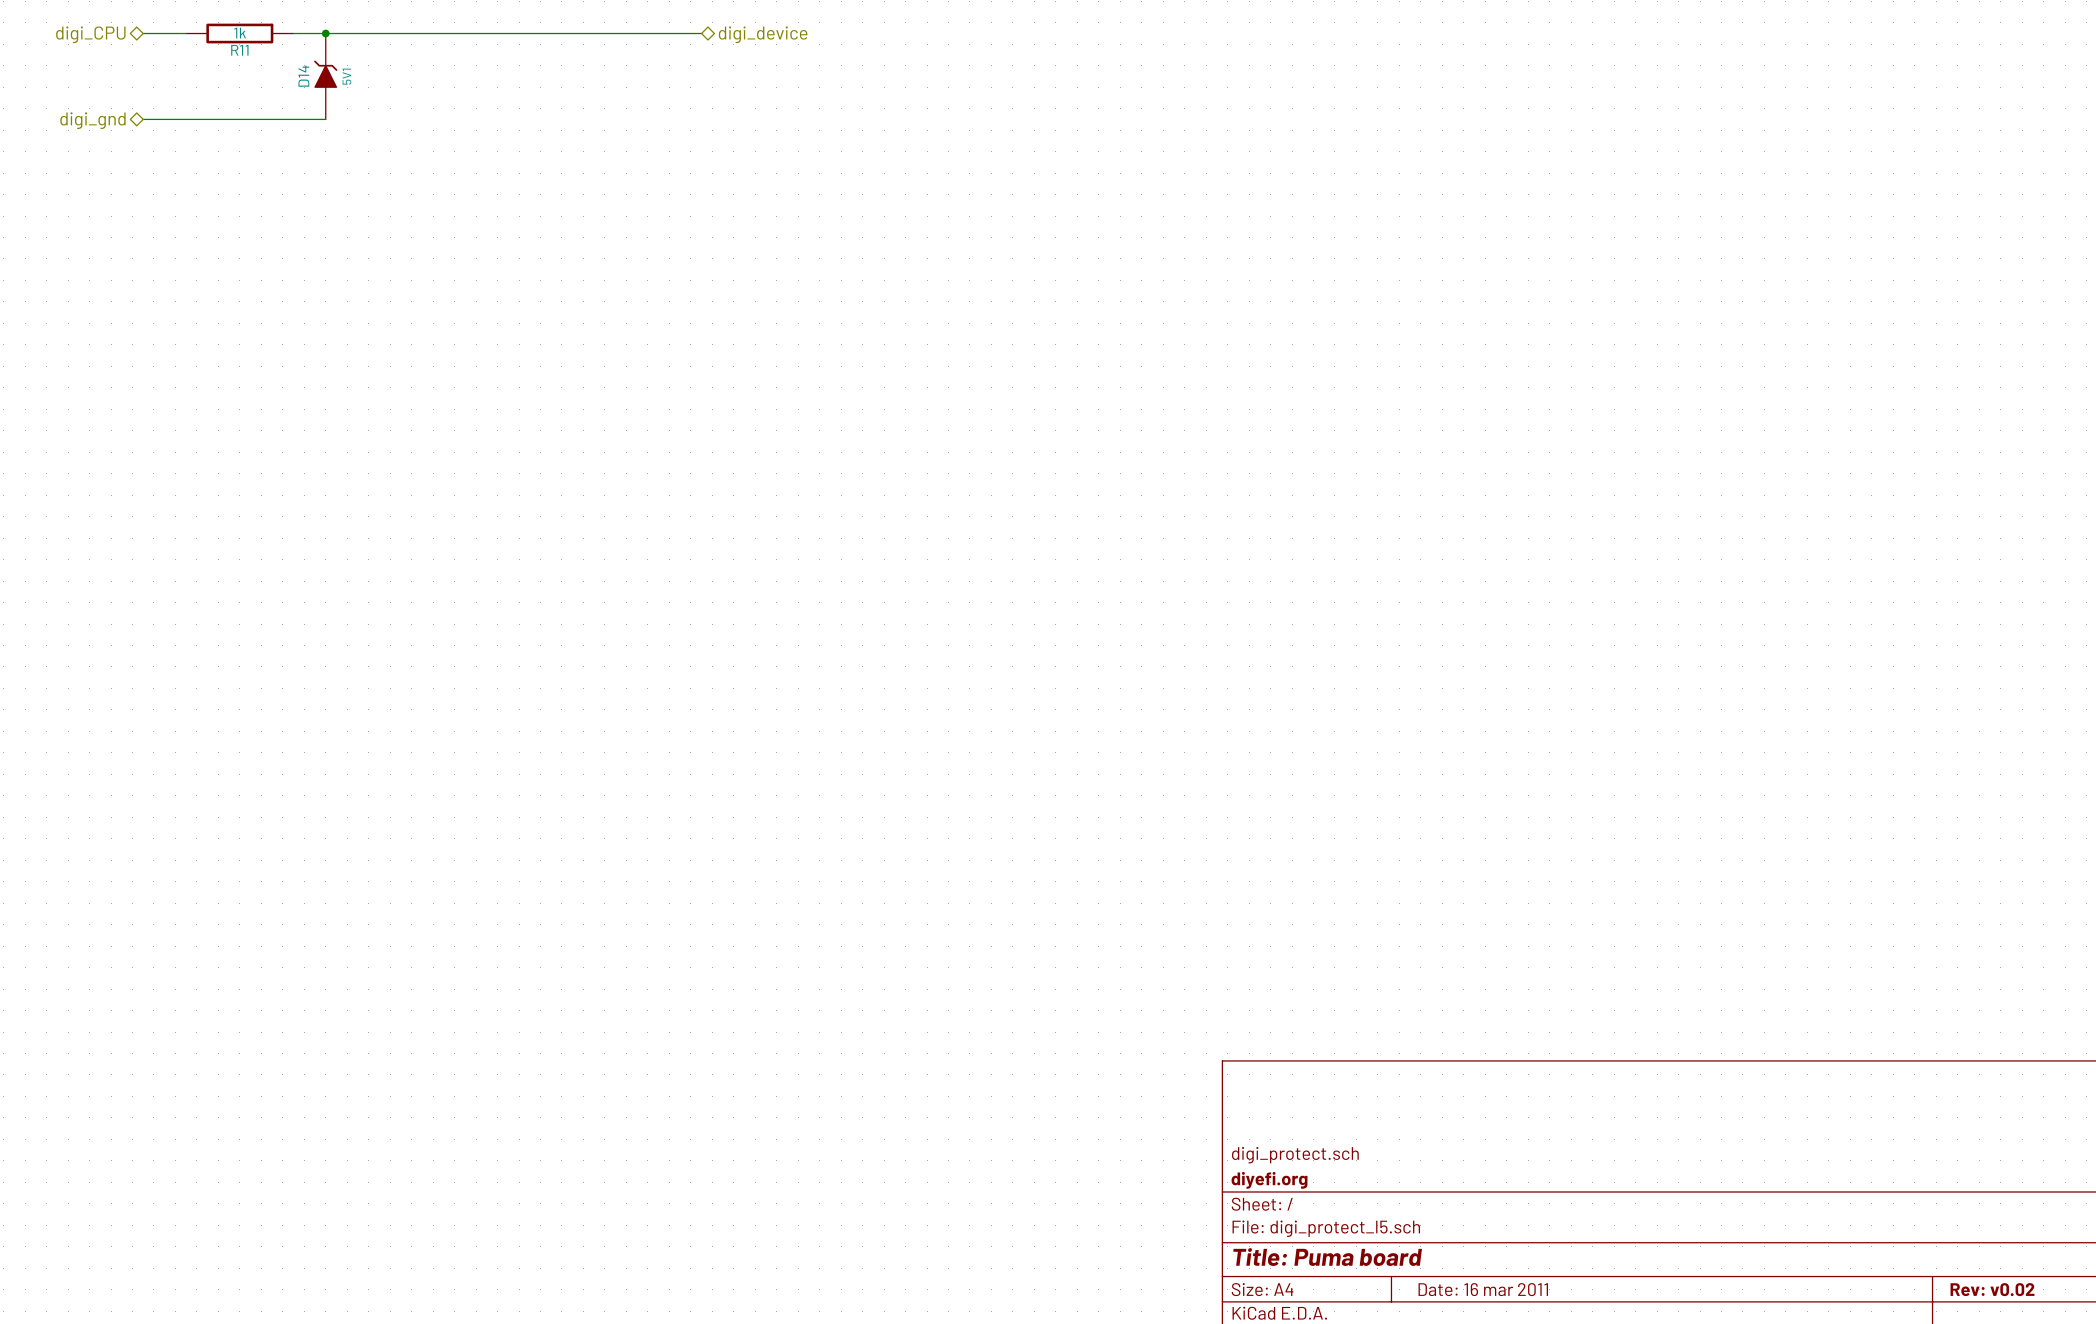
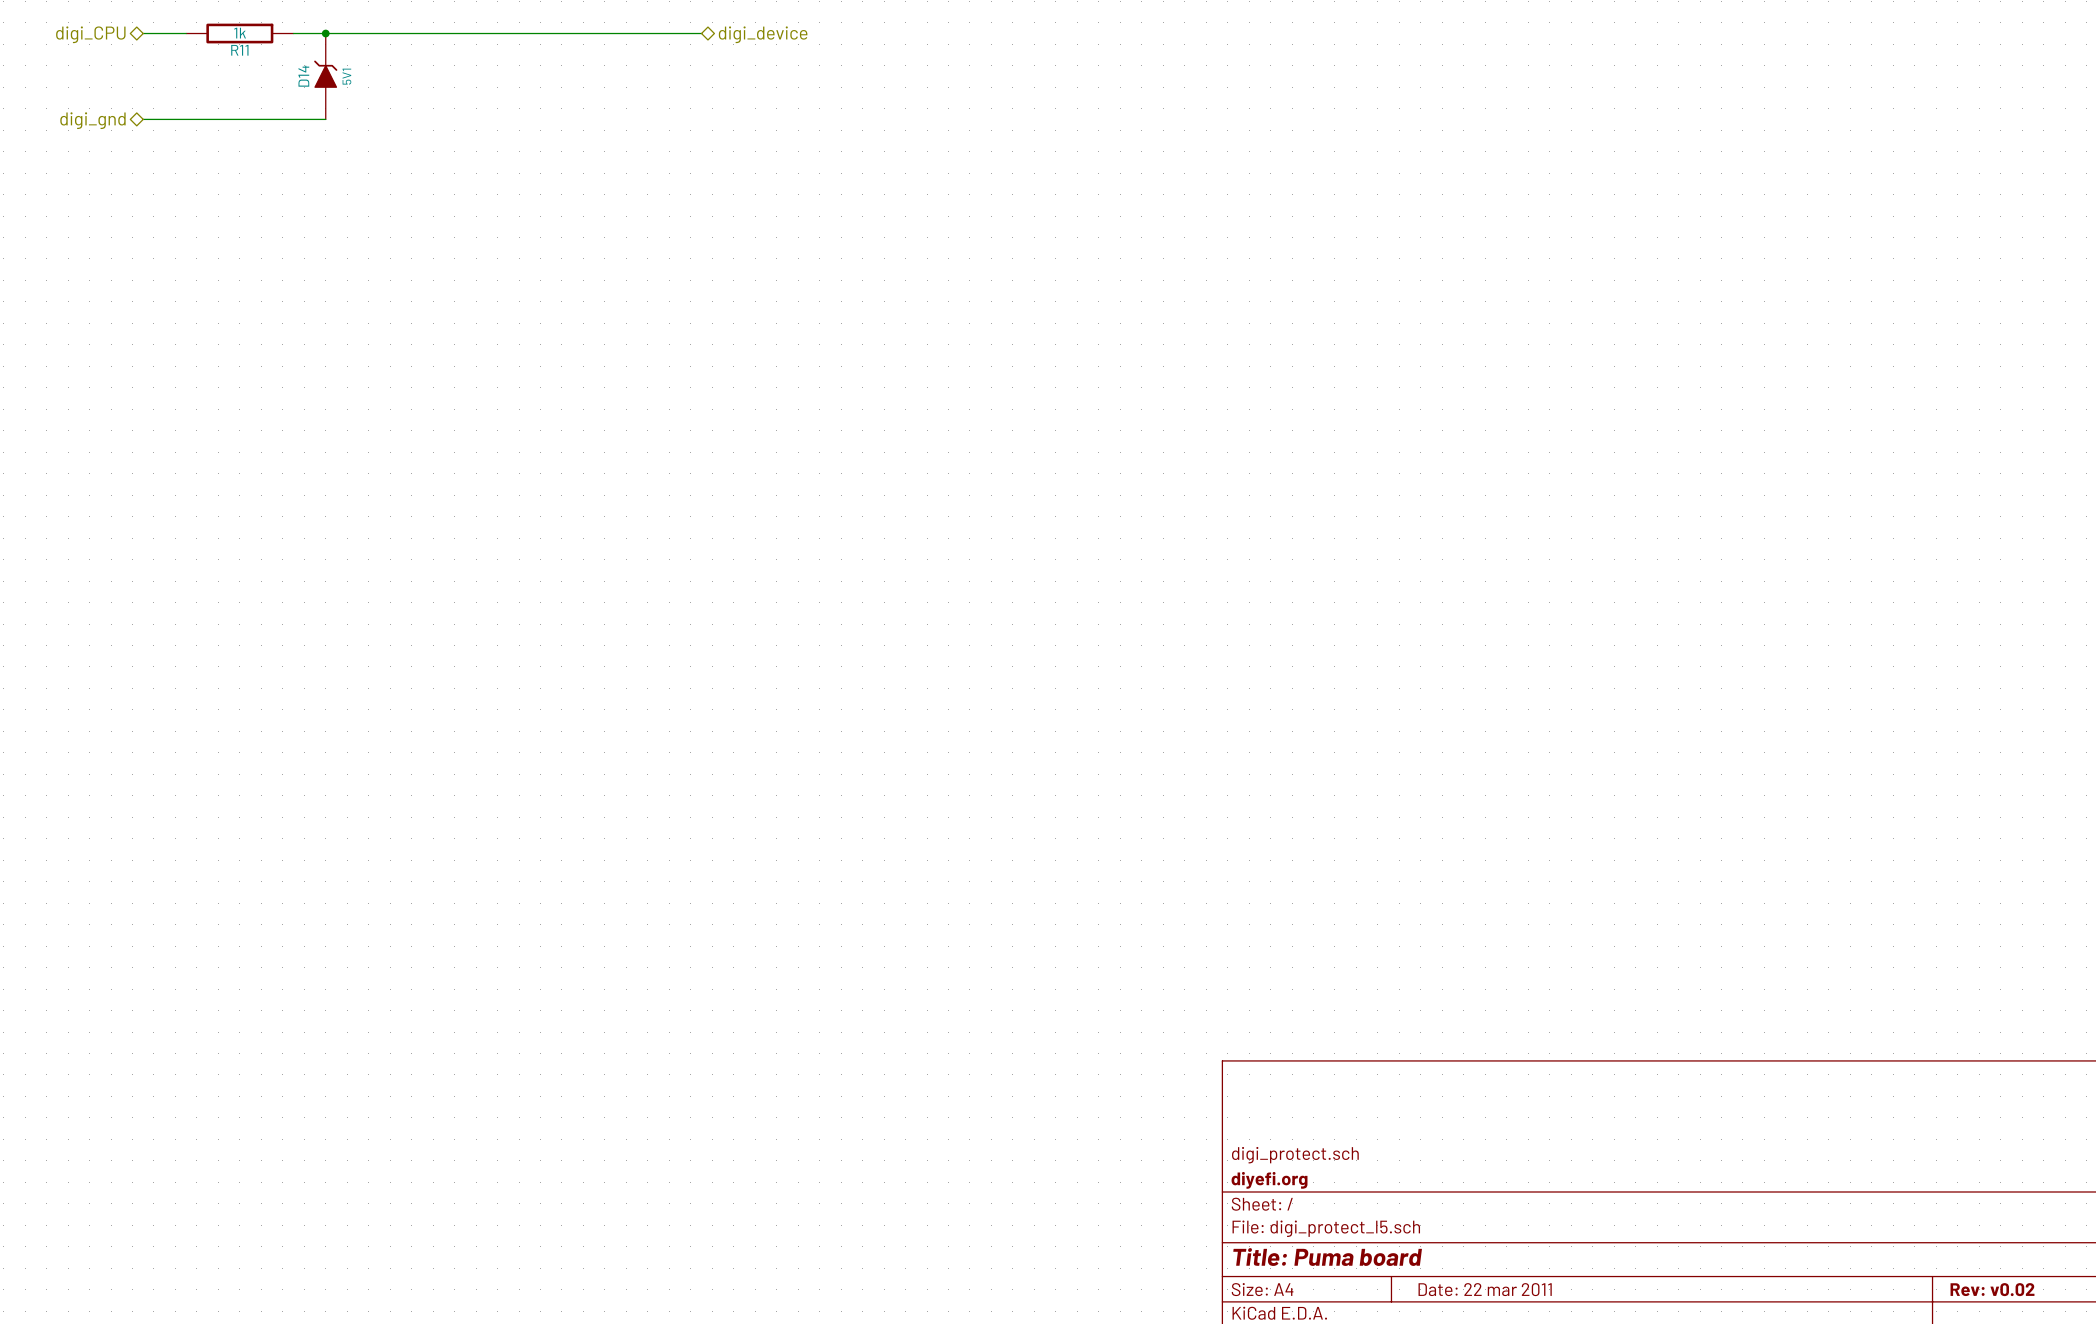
title block: Date: 16 mar 2011 (1483, 1289) -> Date: 22 mar 2011 (1485, 1289)

